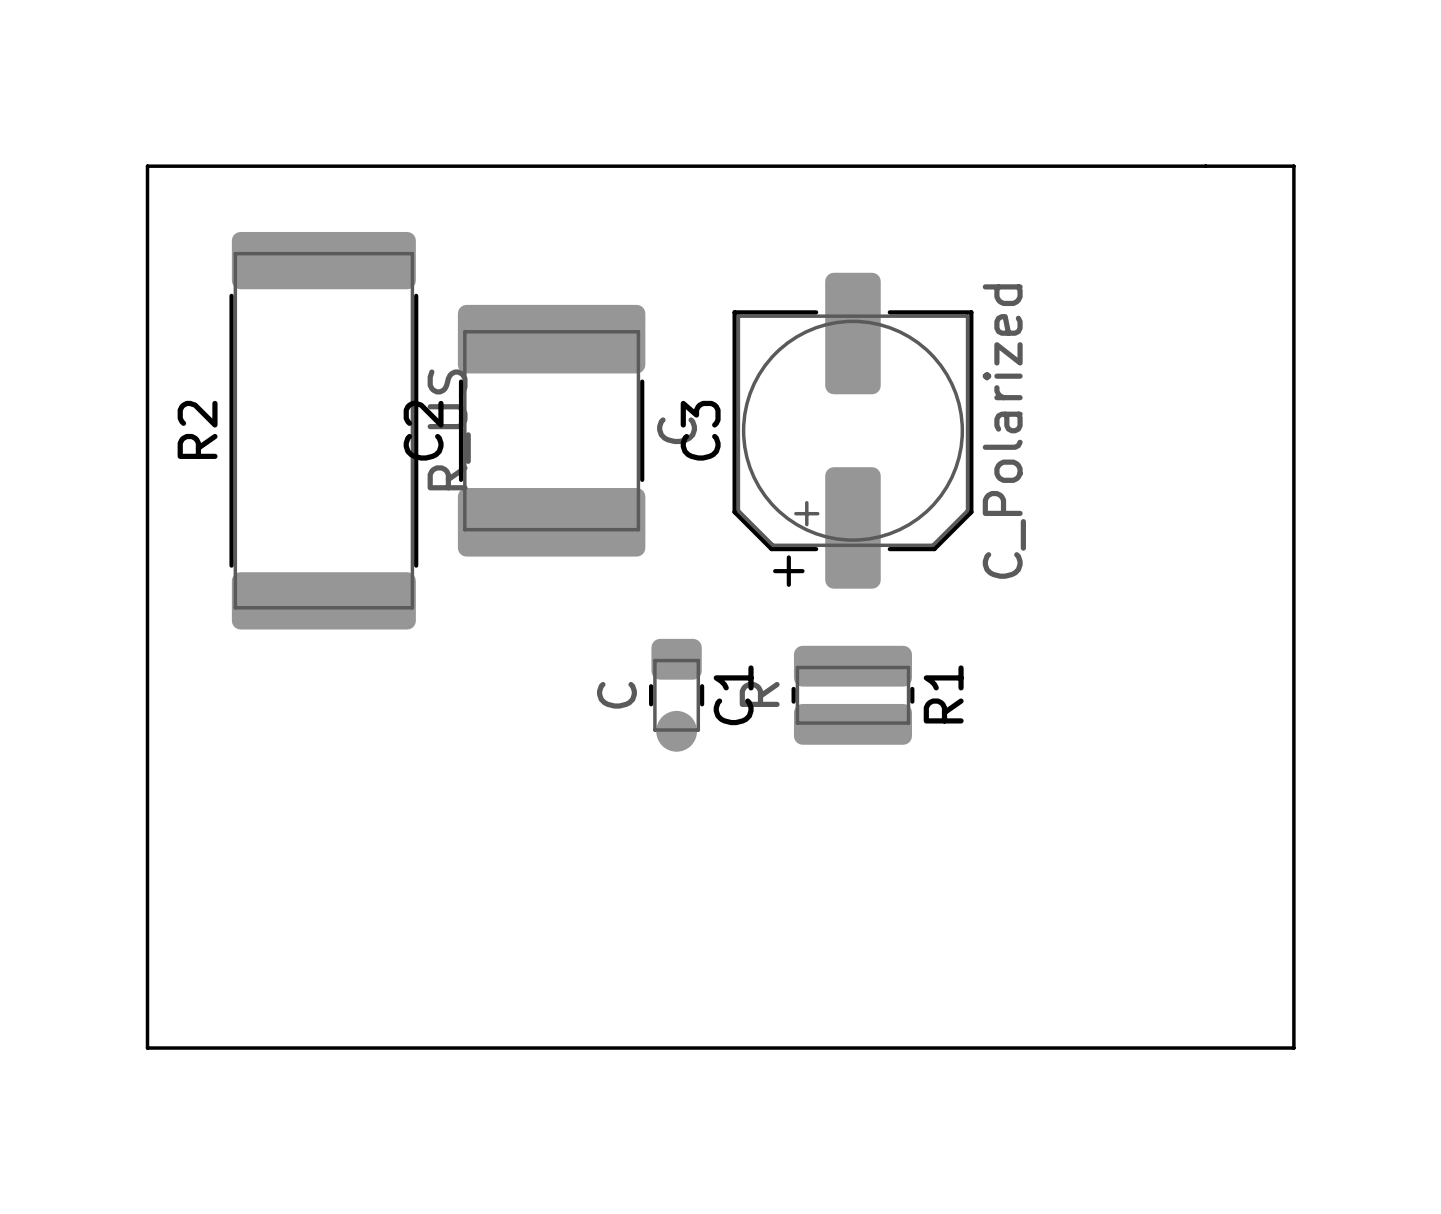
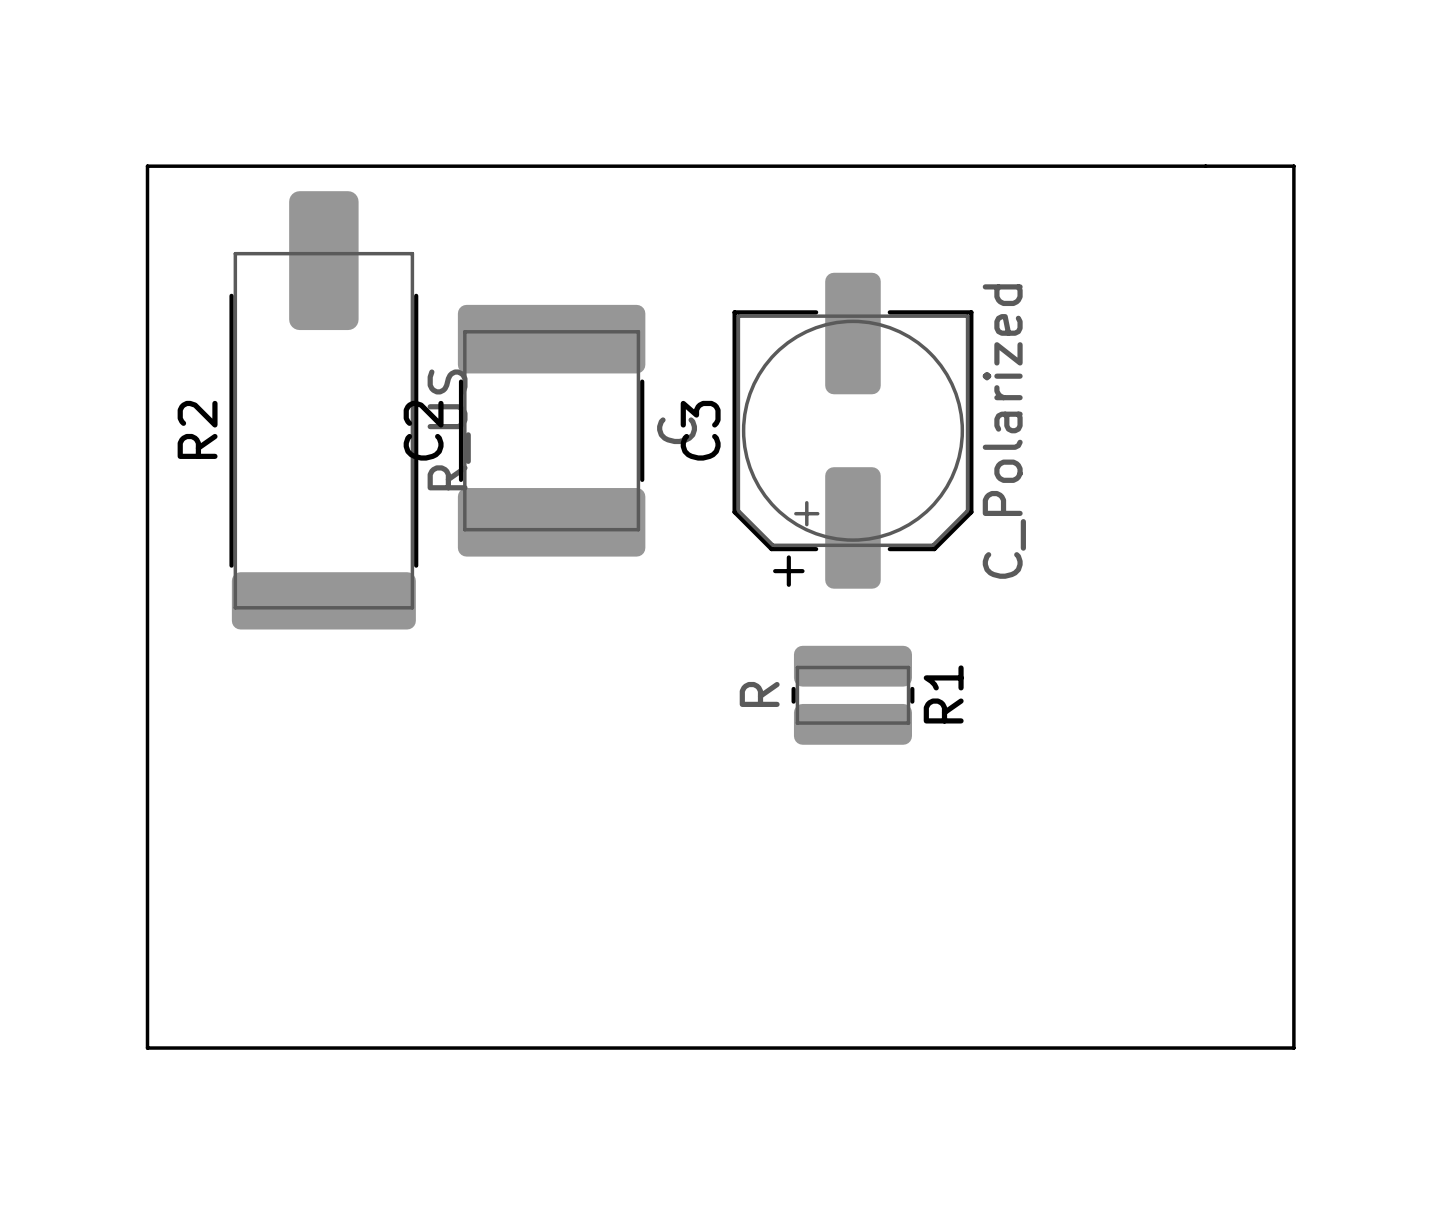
R2 footprint: [229, 231, 419, 630] -> [229, 191, 419, 630]
C1: C (676, 695) -> none

